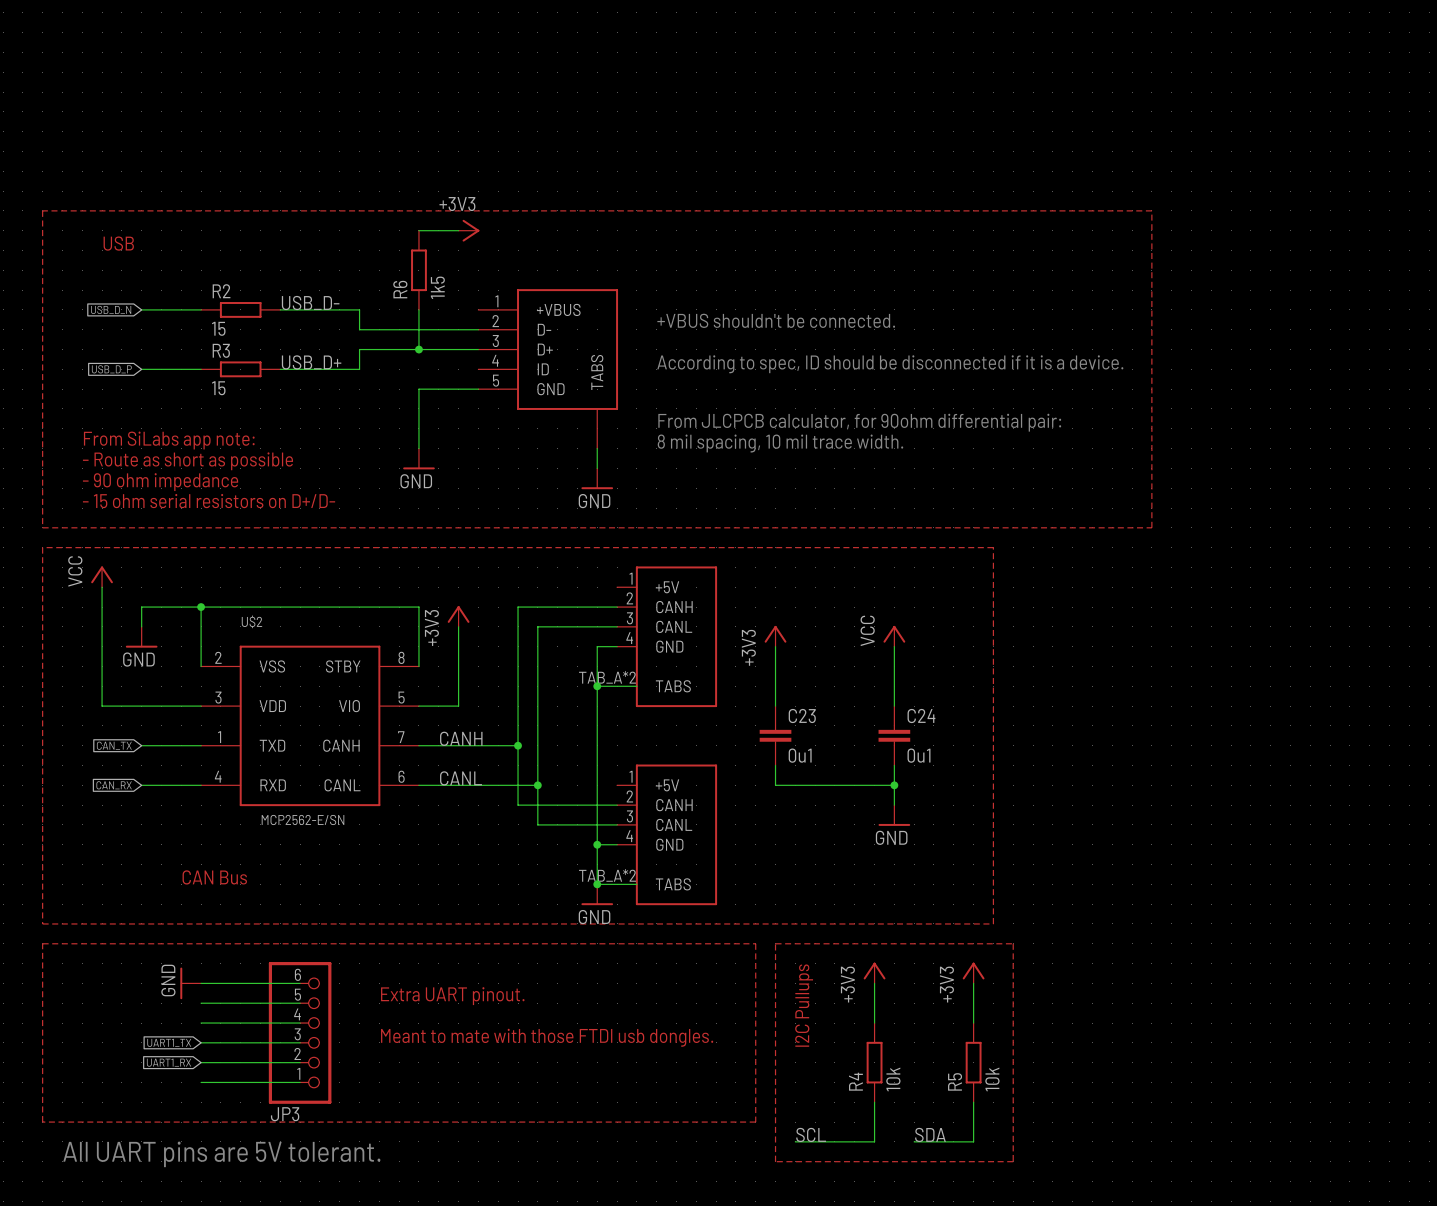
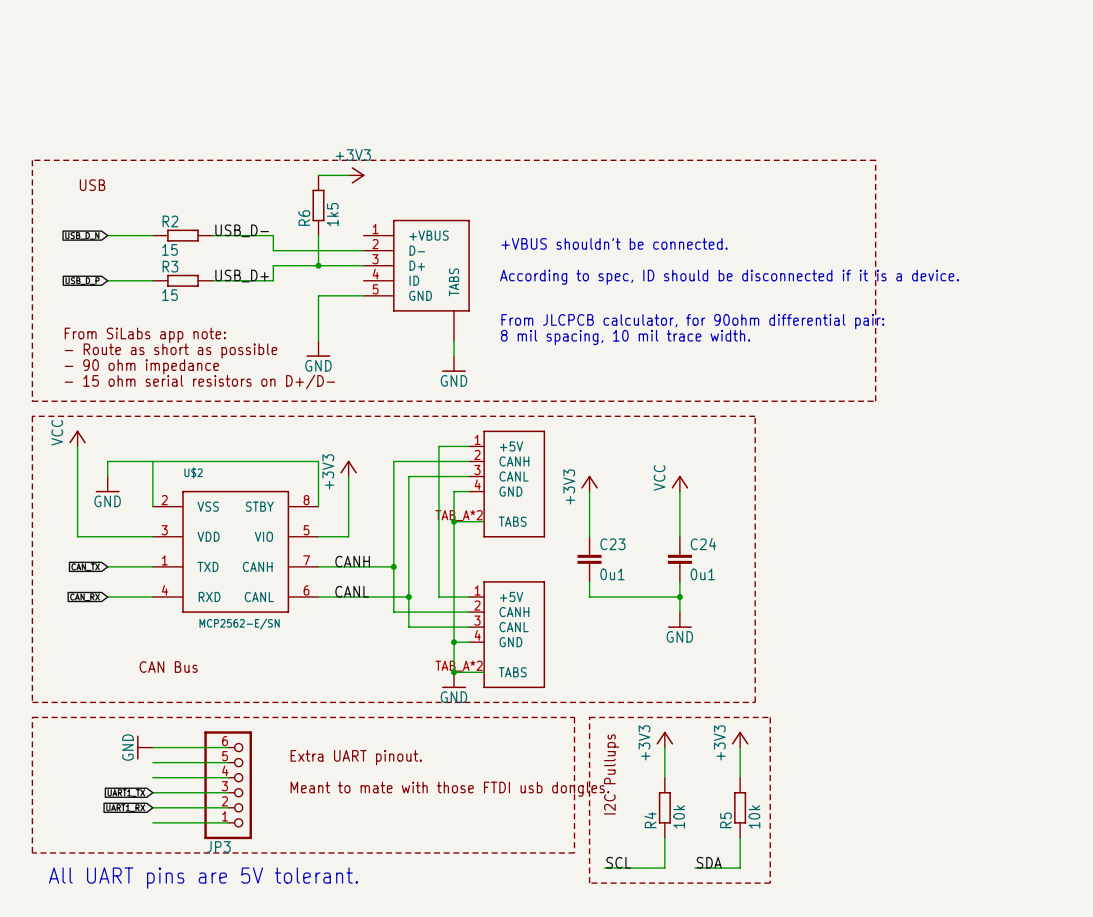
wire: none -> (469, 446) (438, 446) (438, 597) (469, 597)
junction: (201, 607) -> none

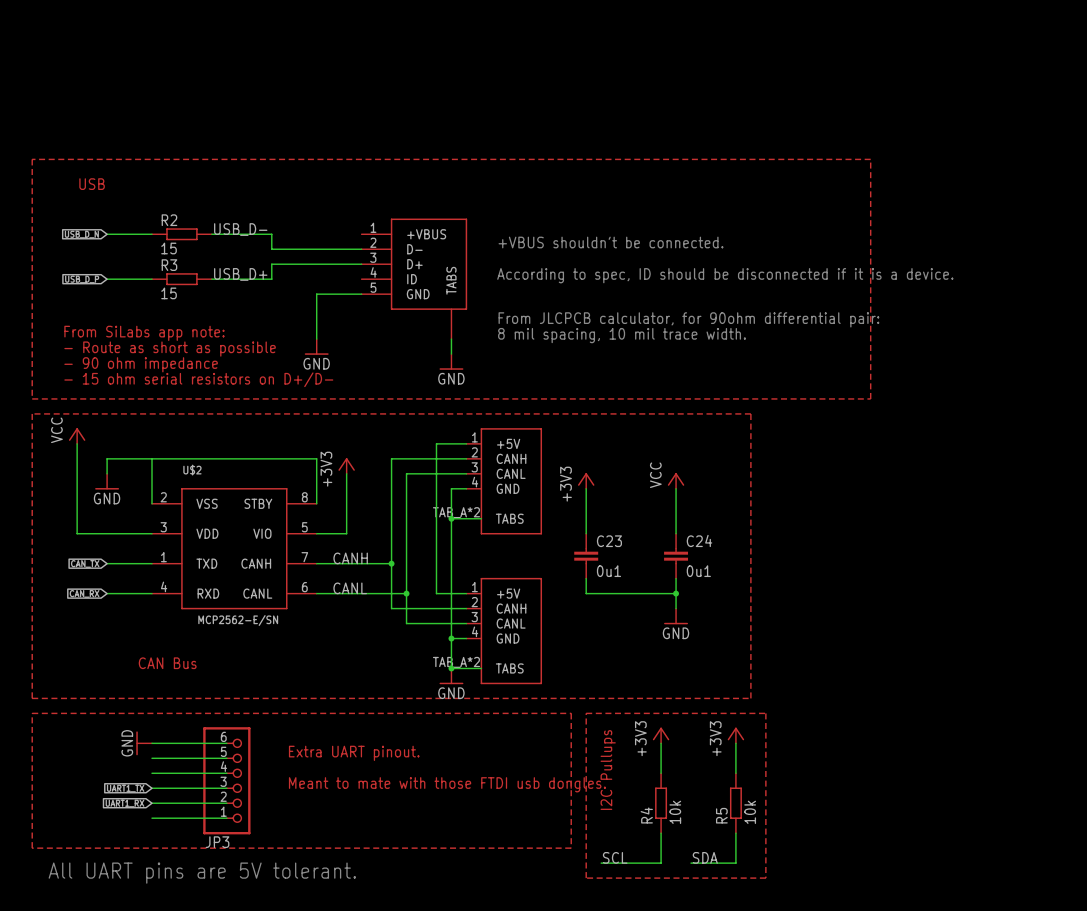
wire: (318, 175) (348, 175) -> none
power symbol: +3V3 (356, 175) -> none
R6: 1k5 (318, 205) -> none
wire: (318, 235) (318, 265) -> none
junction: (318, 265) -> none

